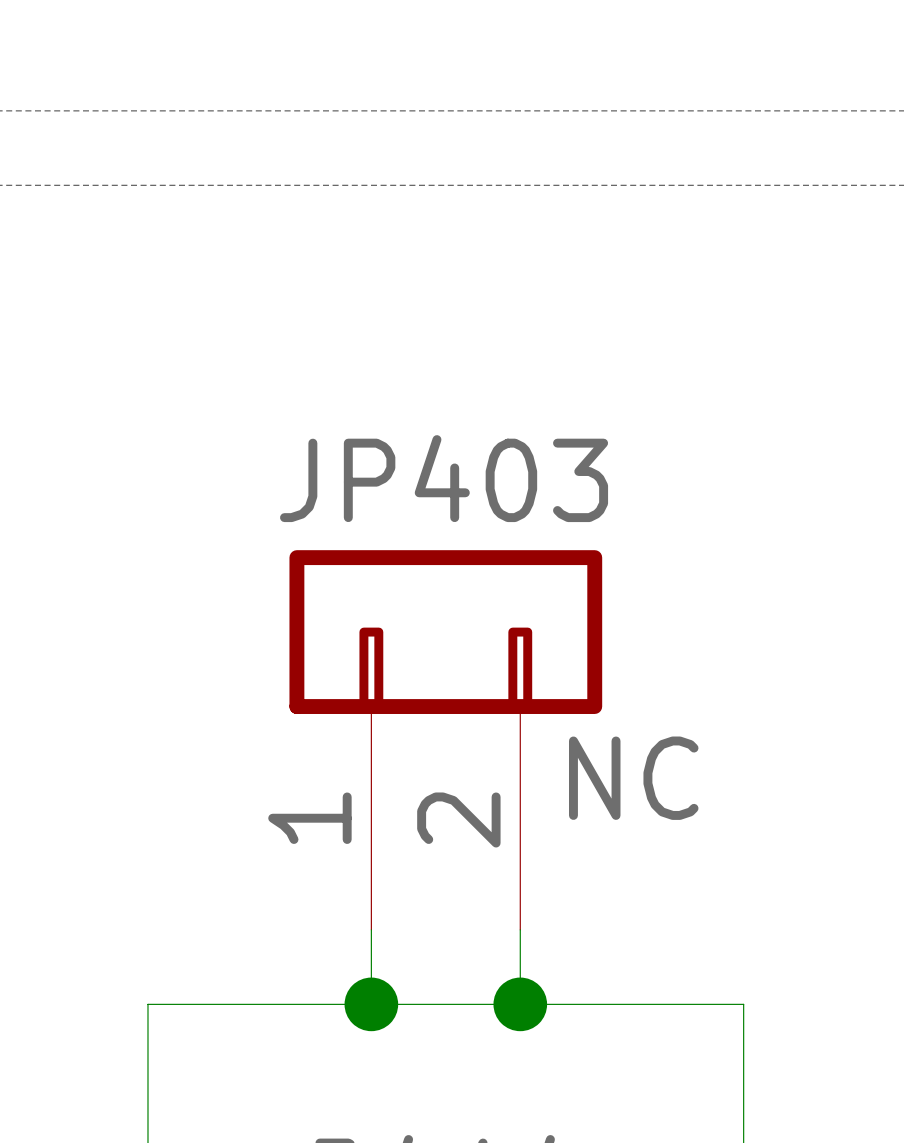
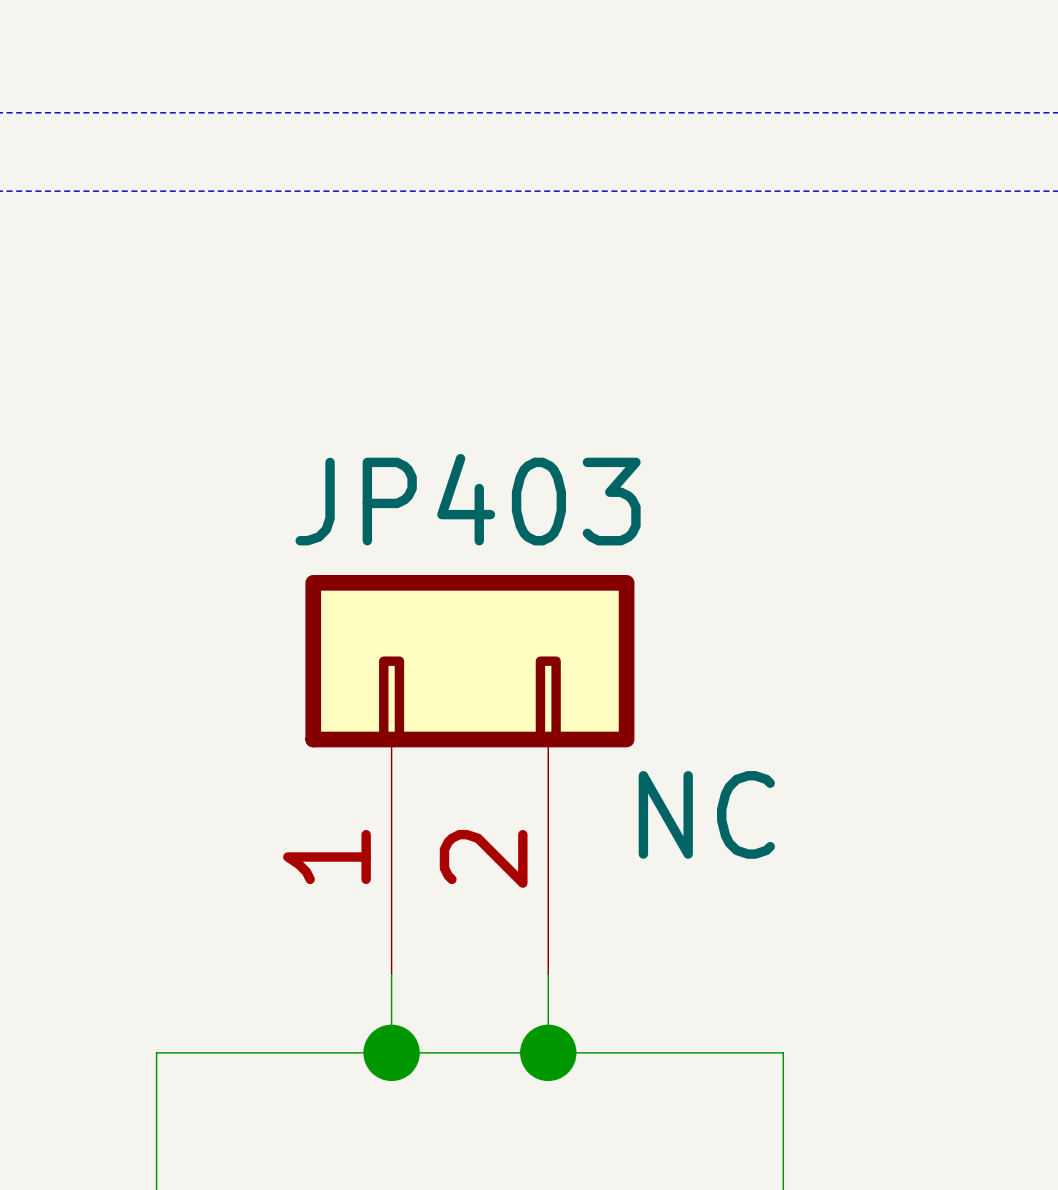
JP403 value position: NC (633, 778) -> NC (706, 814)

